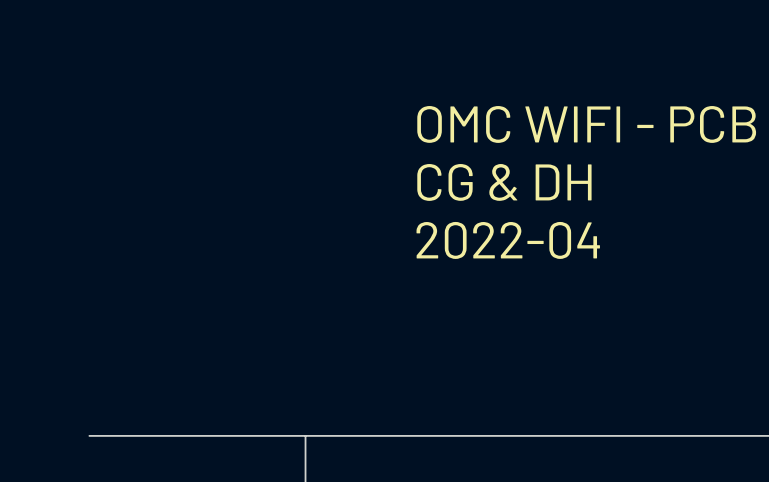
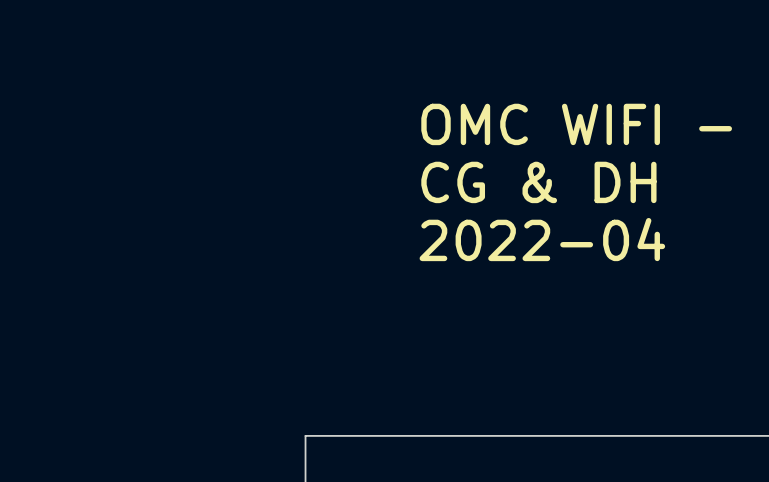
board edge: (89, 435) (305, 435) -> none

